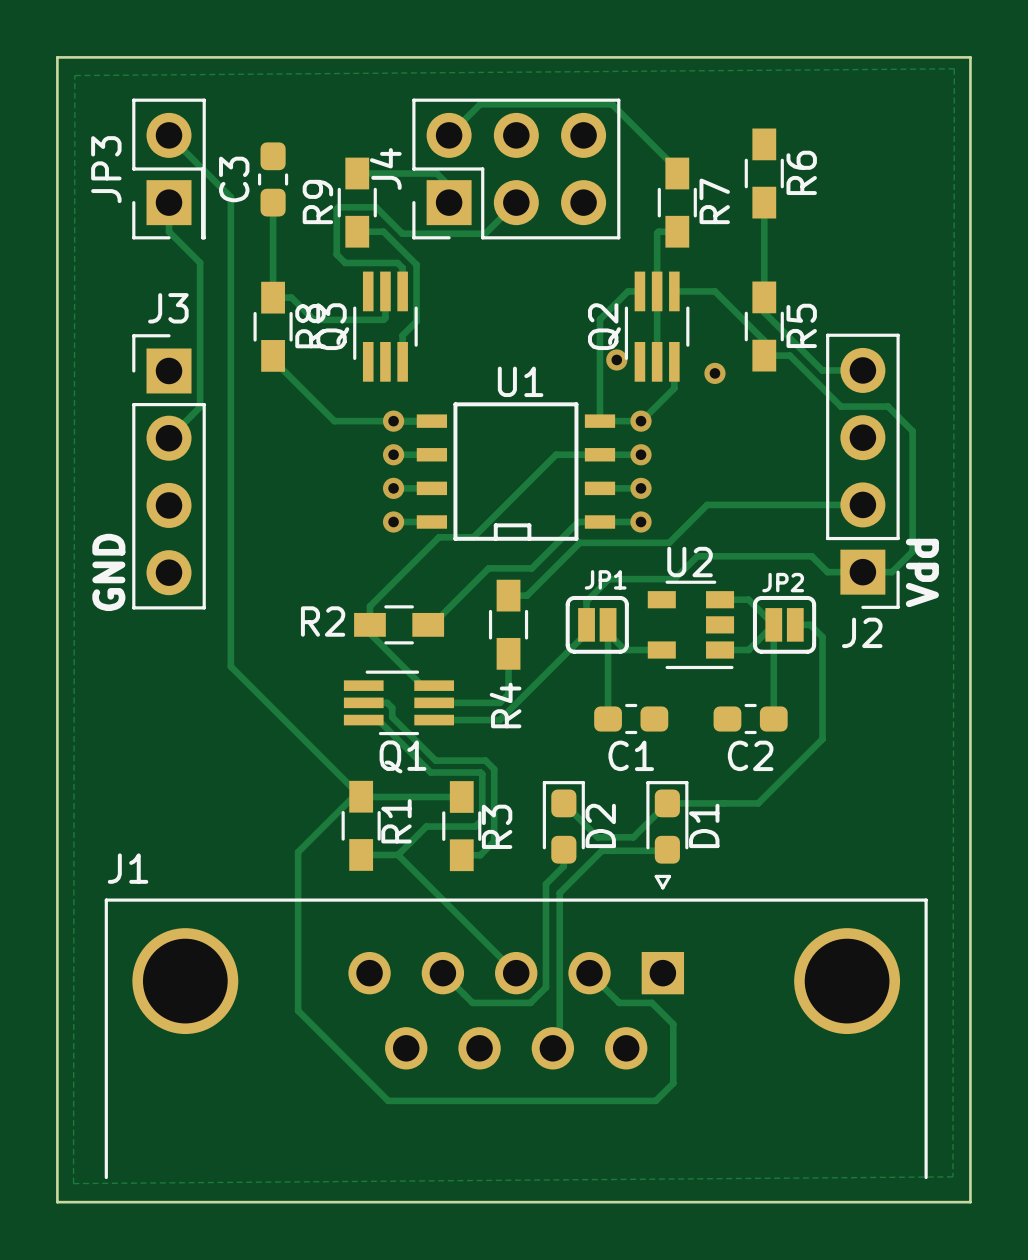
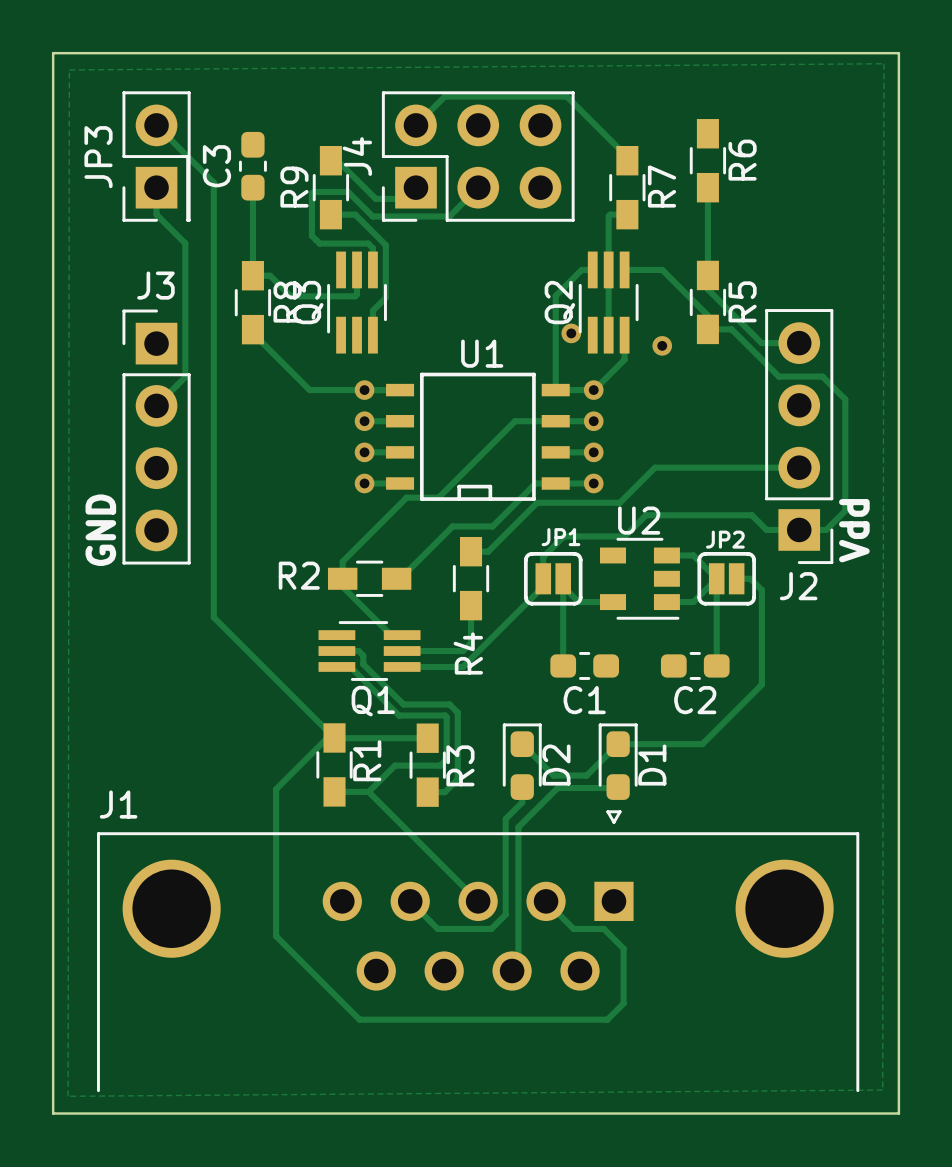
track: (364, 173) (436, 173) (457, 194) -> (337, 160) (375, 198) (404, 198) (423, 179)

